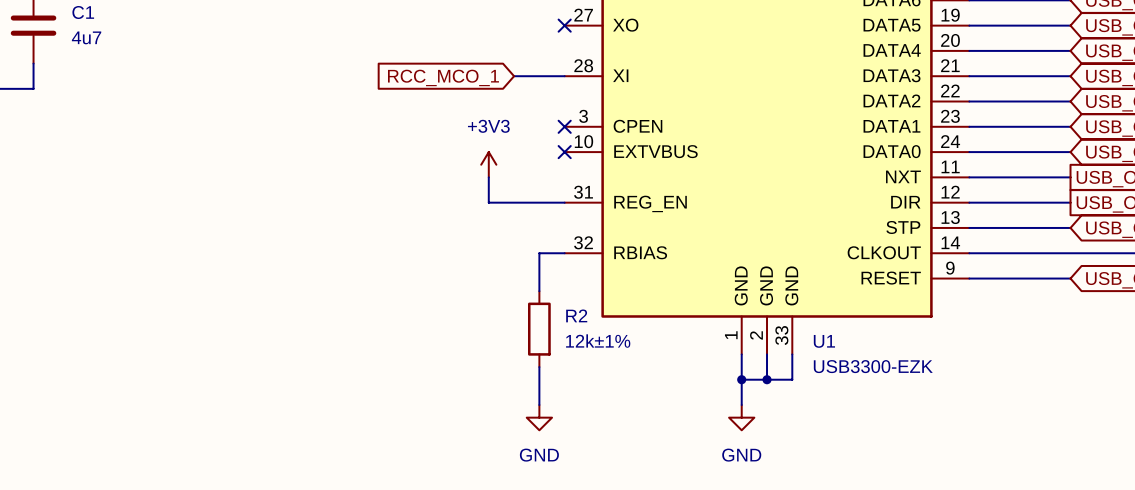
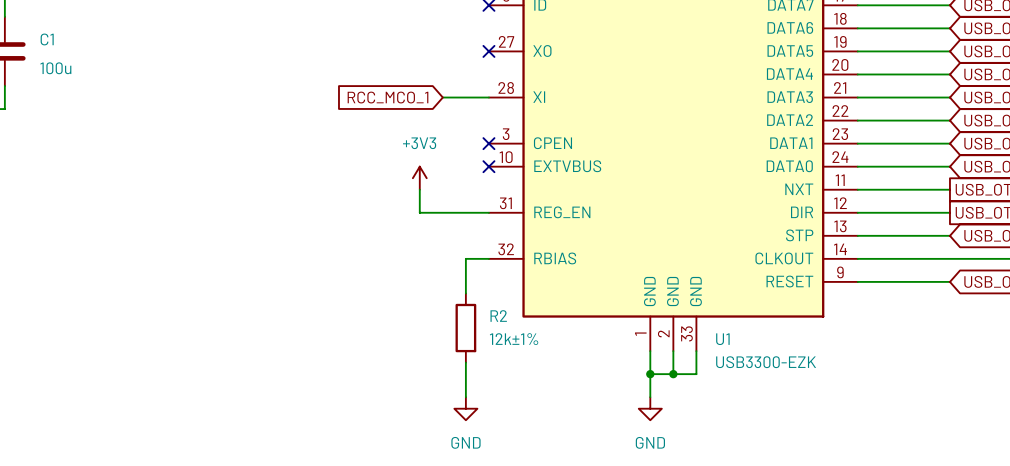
C1 value: 4u7 (86, 37) -> 100u (55, 68)

